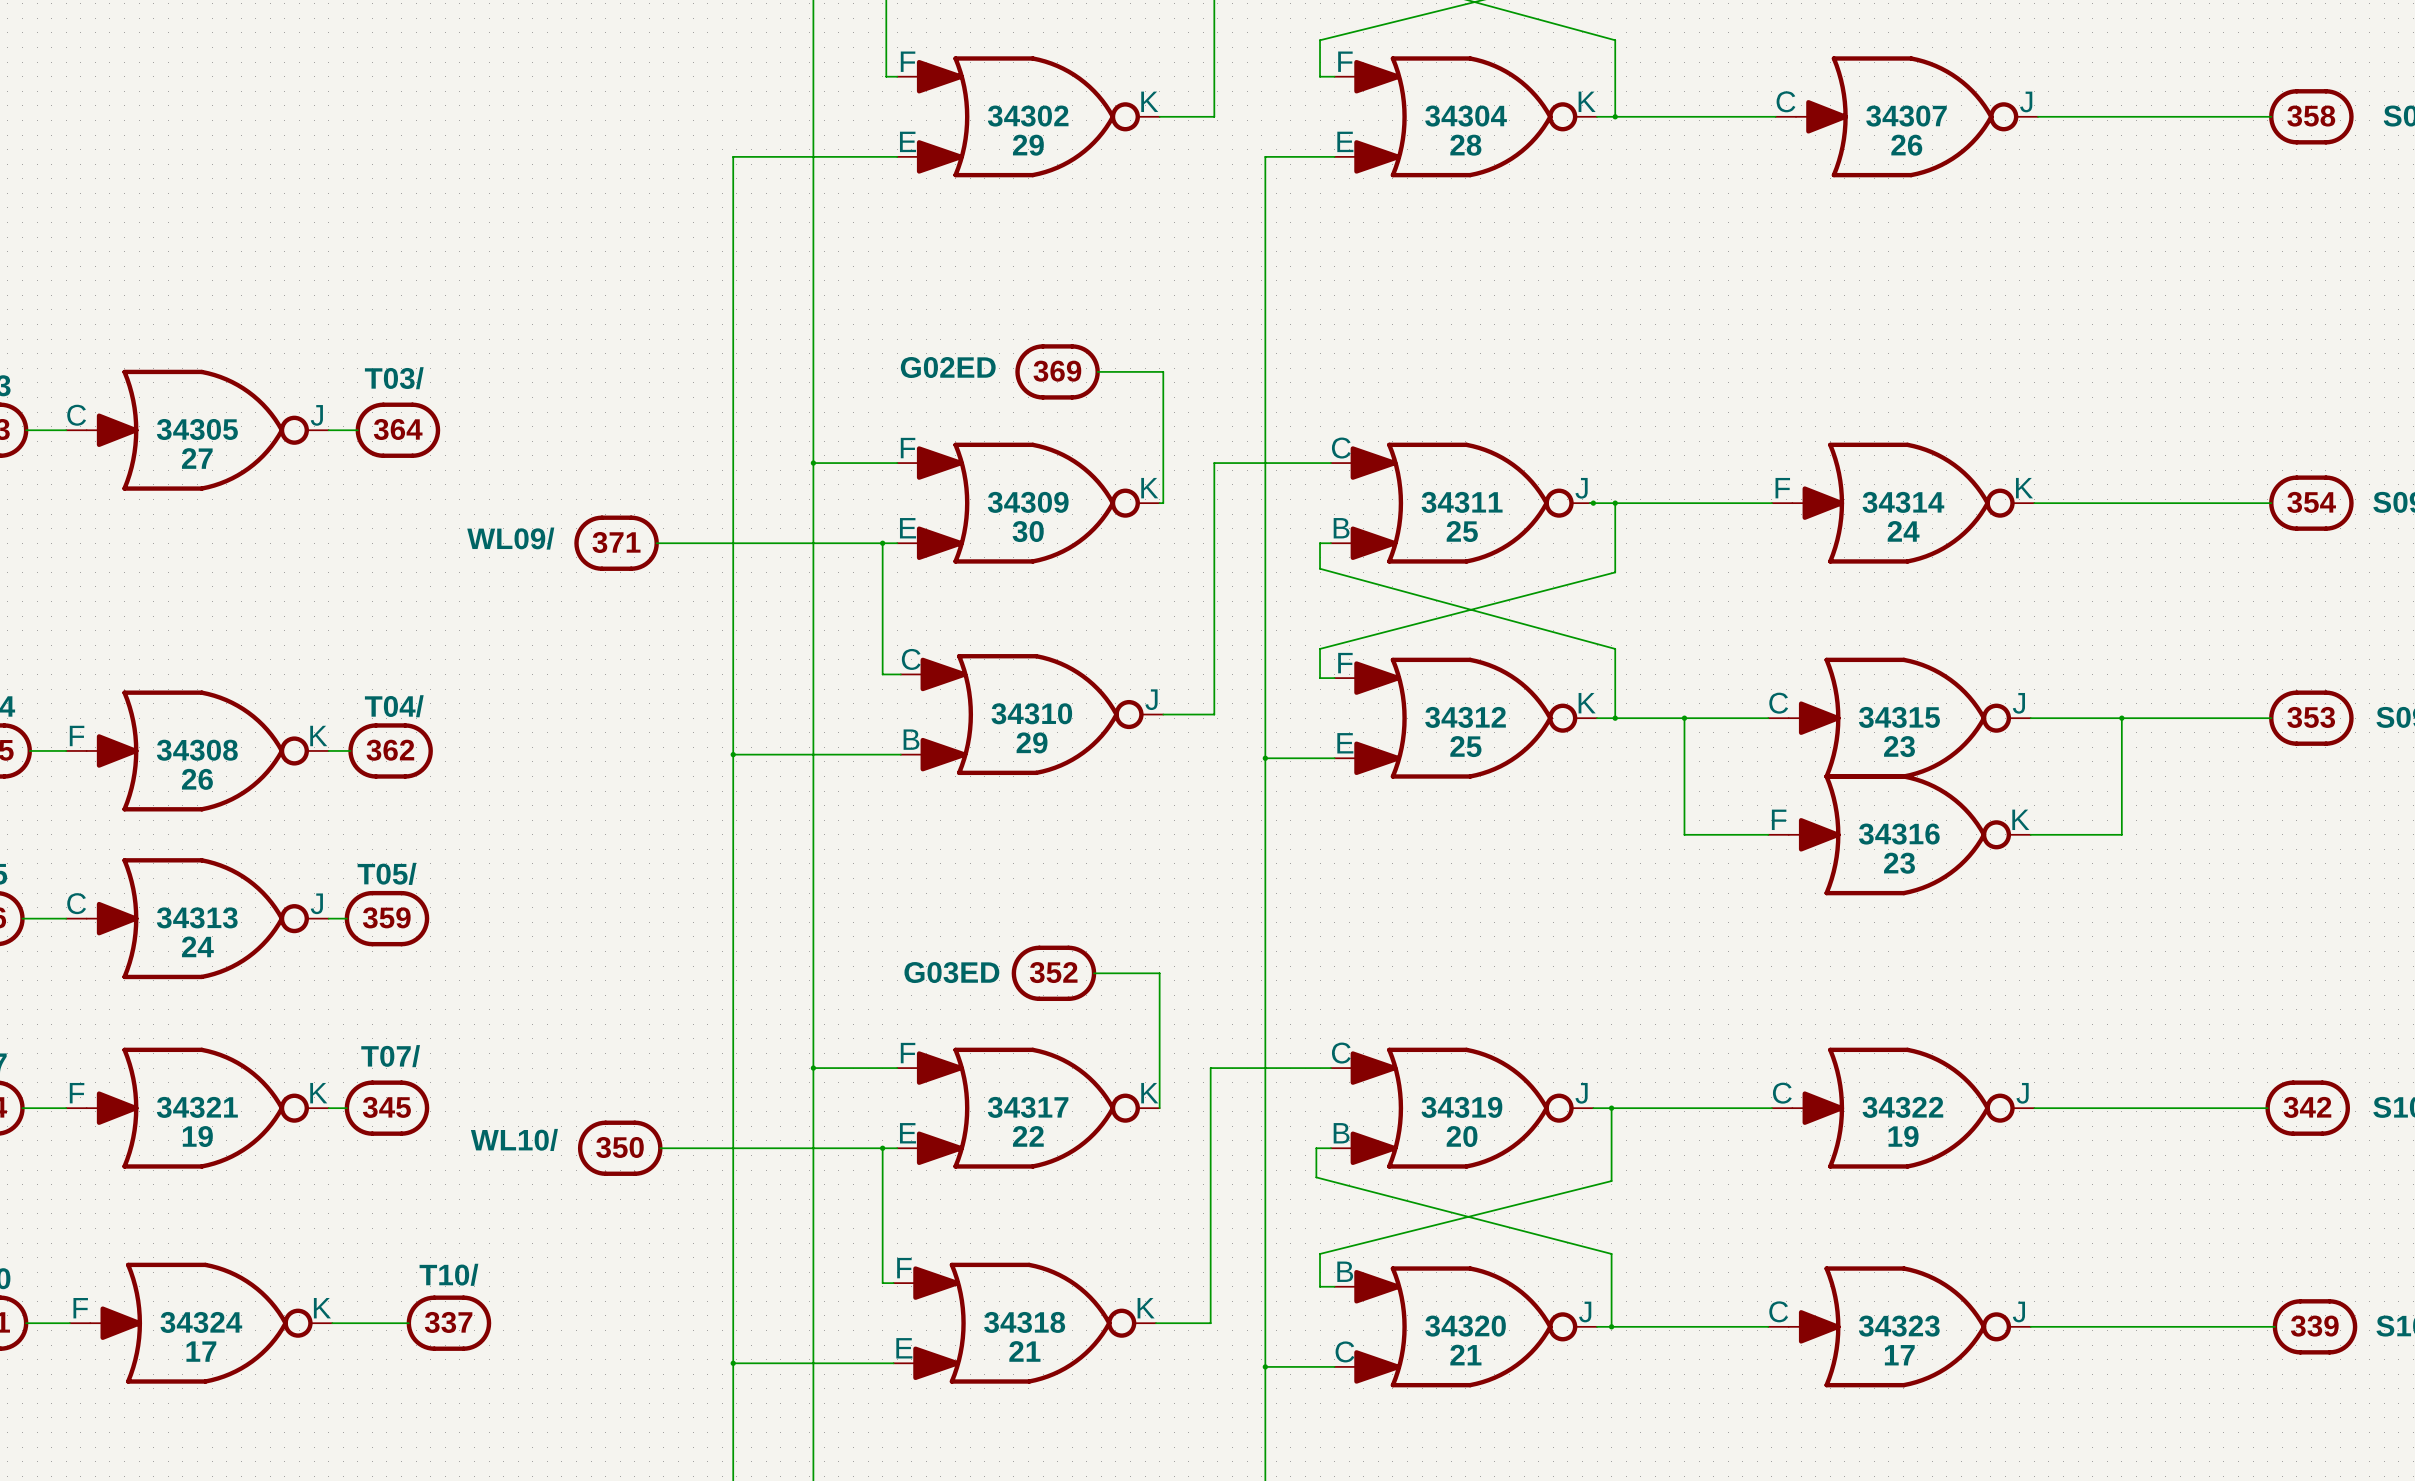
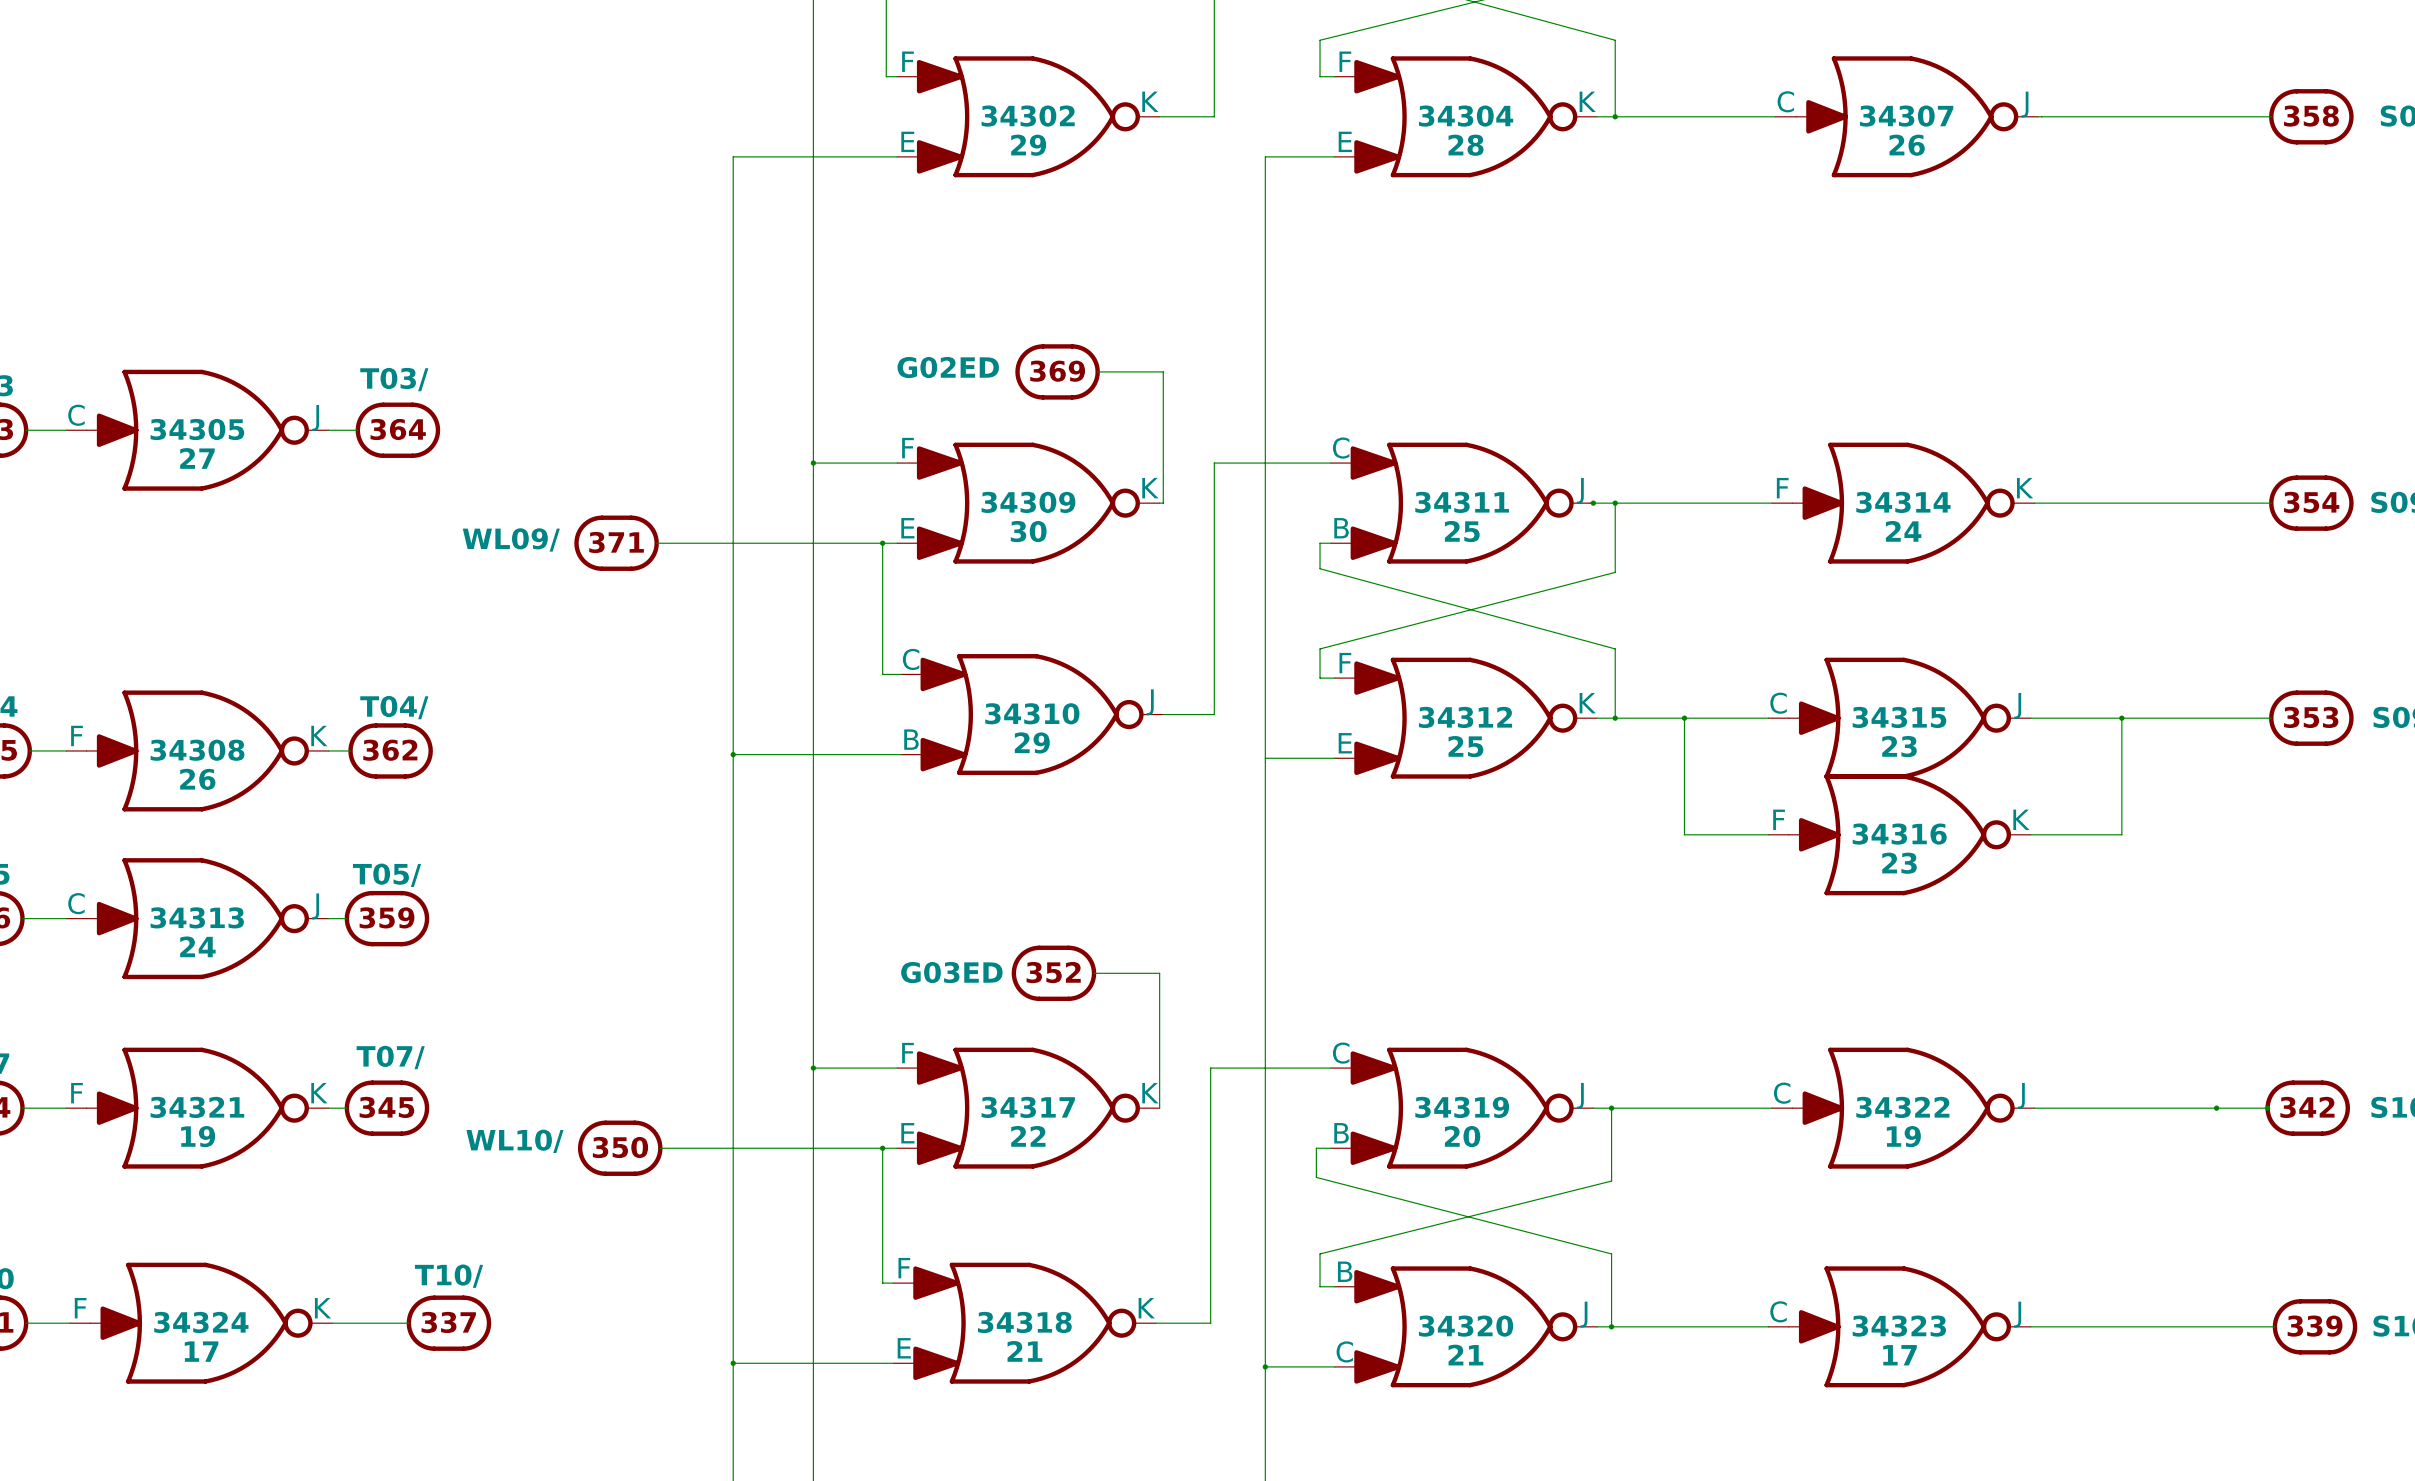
junction: (1265, 758) -> none
junction: none -> (2216, 1108)
junction: none -> (2267, 1108)

